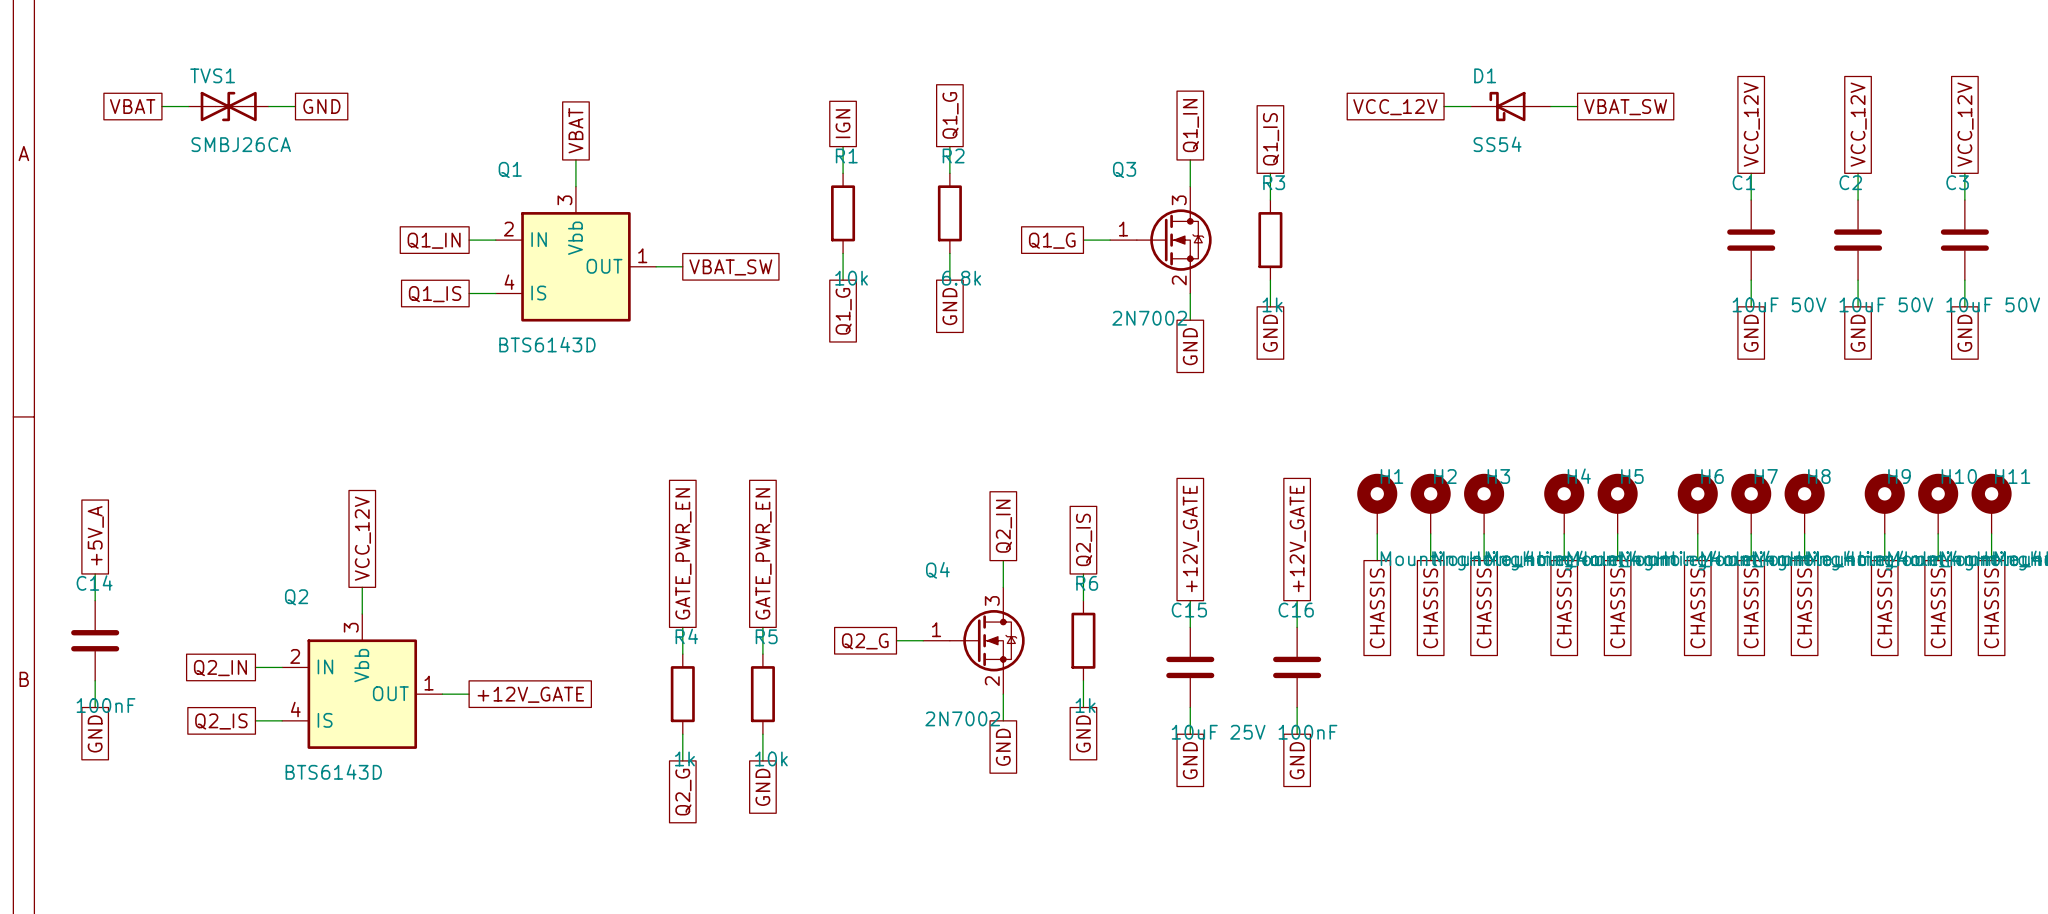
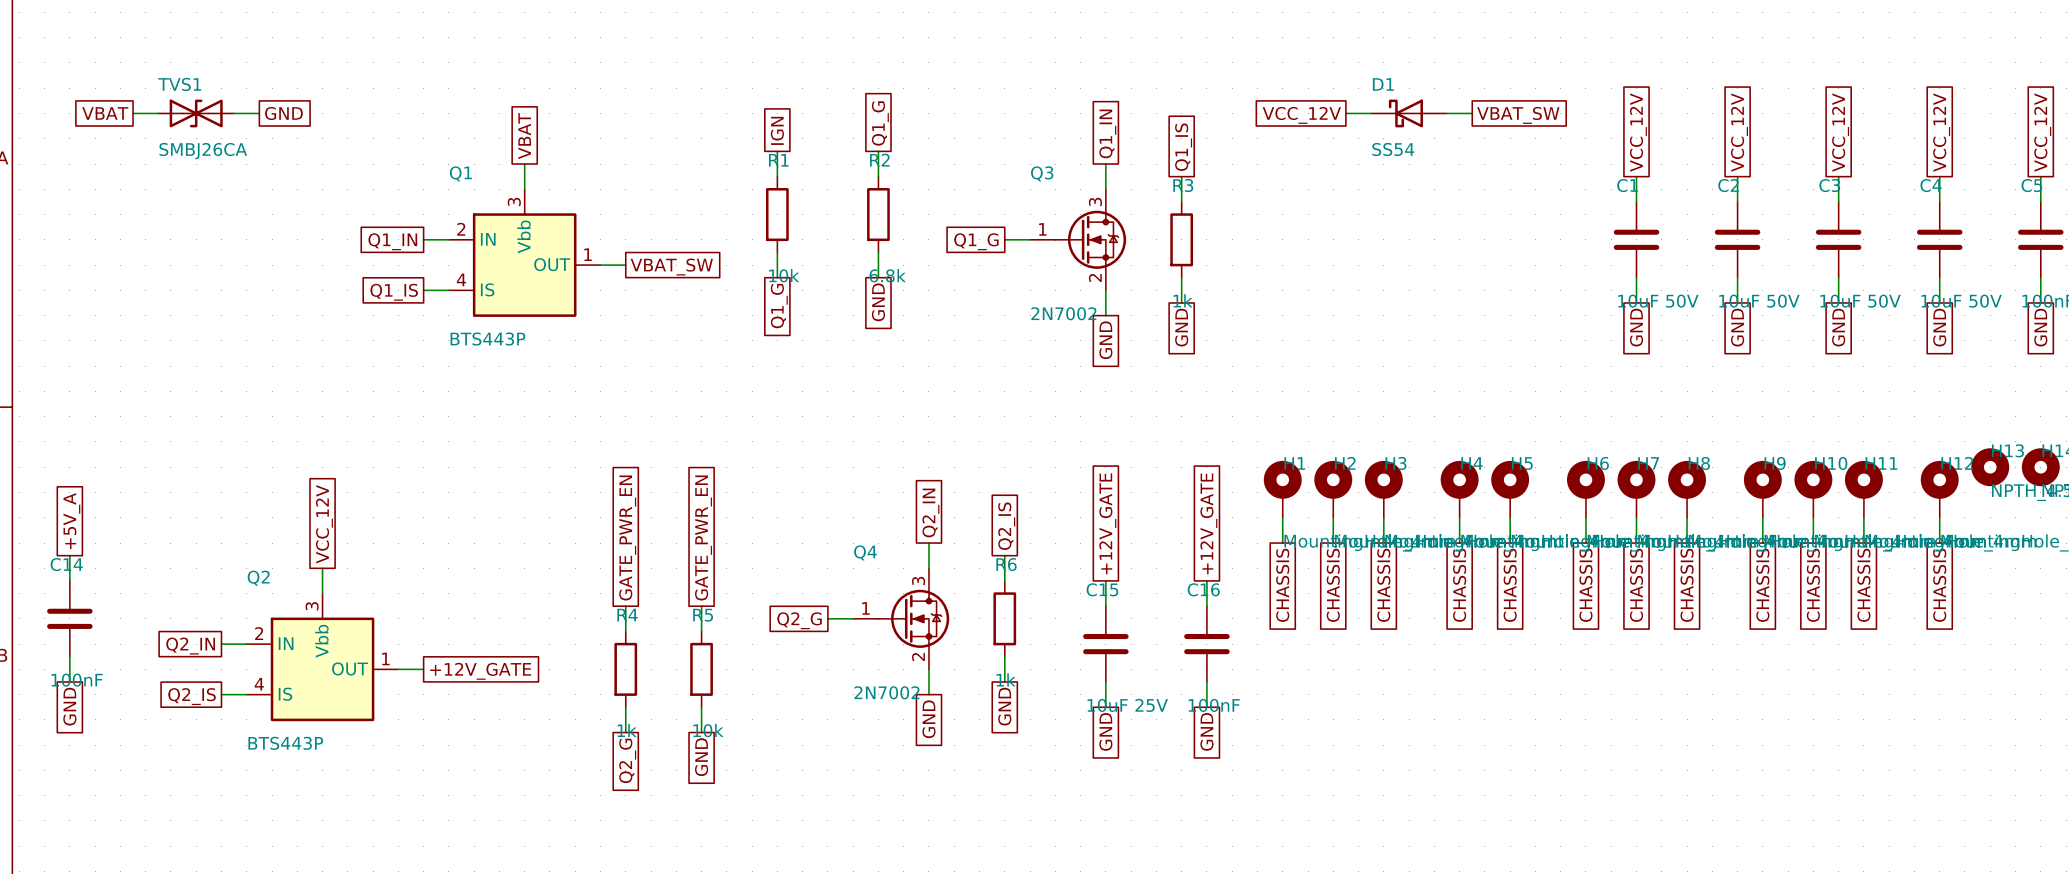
Q1 value: BTS6143D (547, 344) -> BTS443P (487, 339)
Q2 value: BTS6143D (333, 772) -> BTS443P (285, 743)

